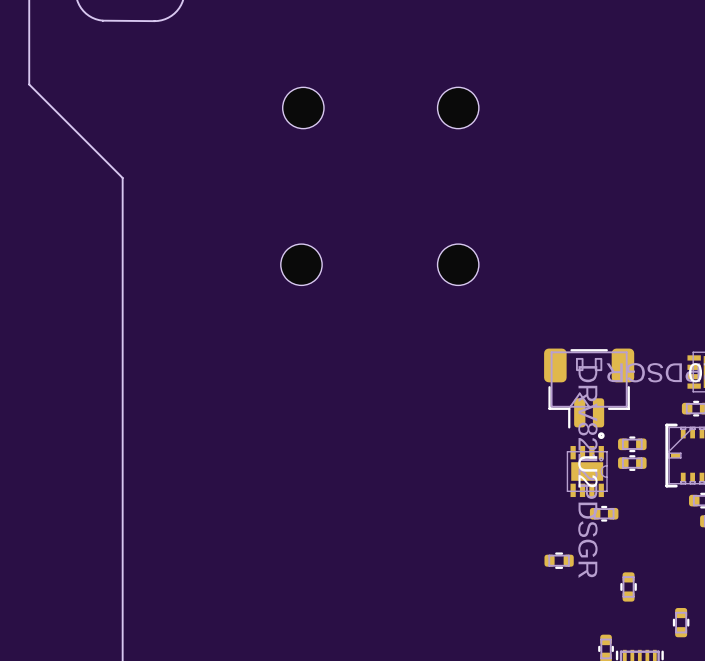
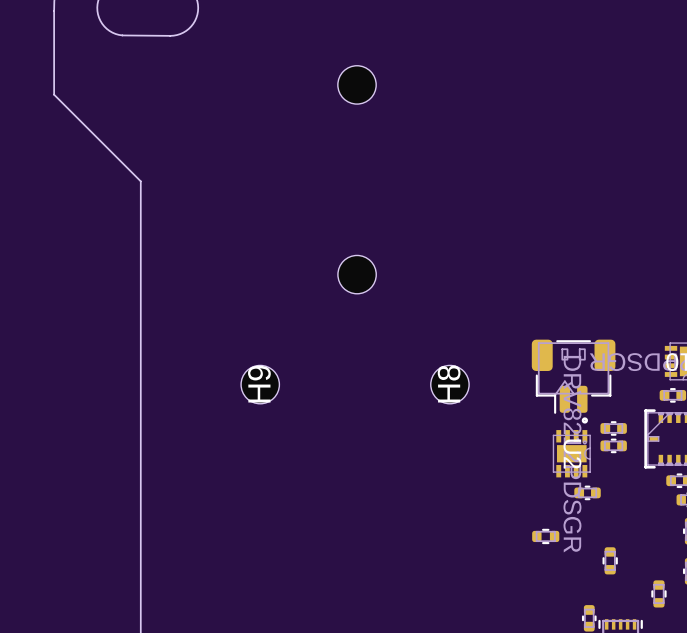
part: none -> (357, 84)
part: (303, 107) -> none
part: (458, 107) -> none
part: (301, 264) -> none
part: (458, 264) -> none
part: none -> (357, 274)
H9: none -> (260, 384)
H8: none -> (449, 384)

